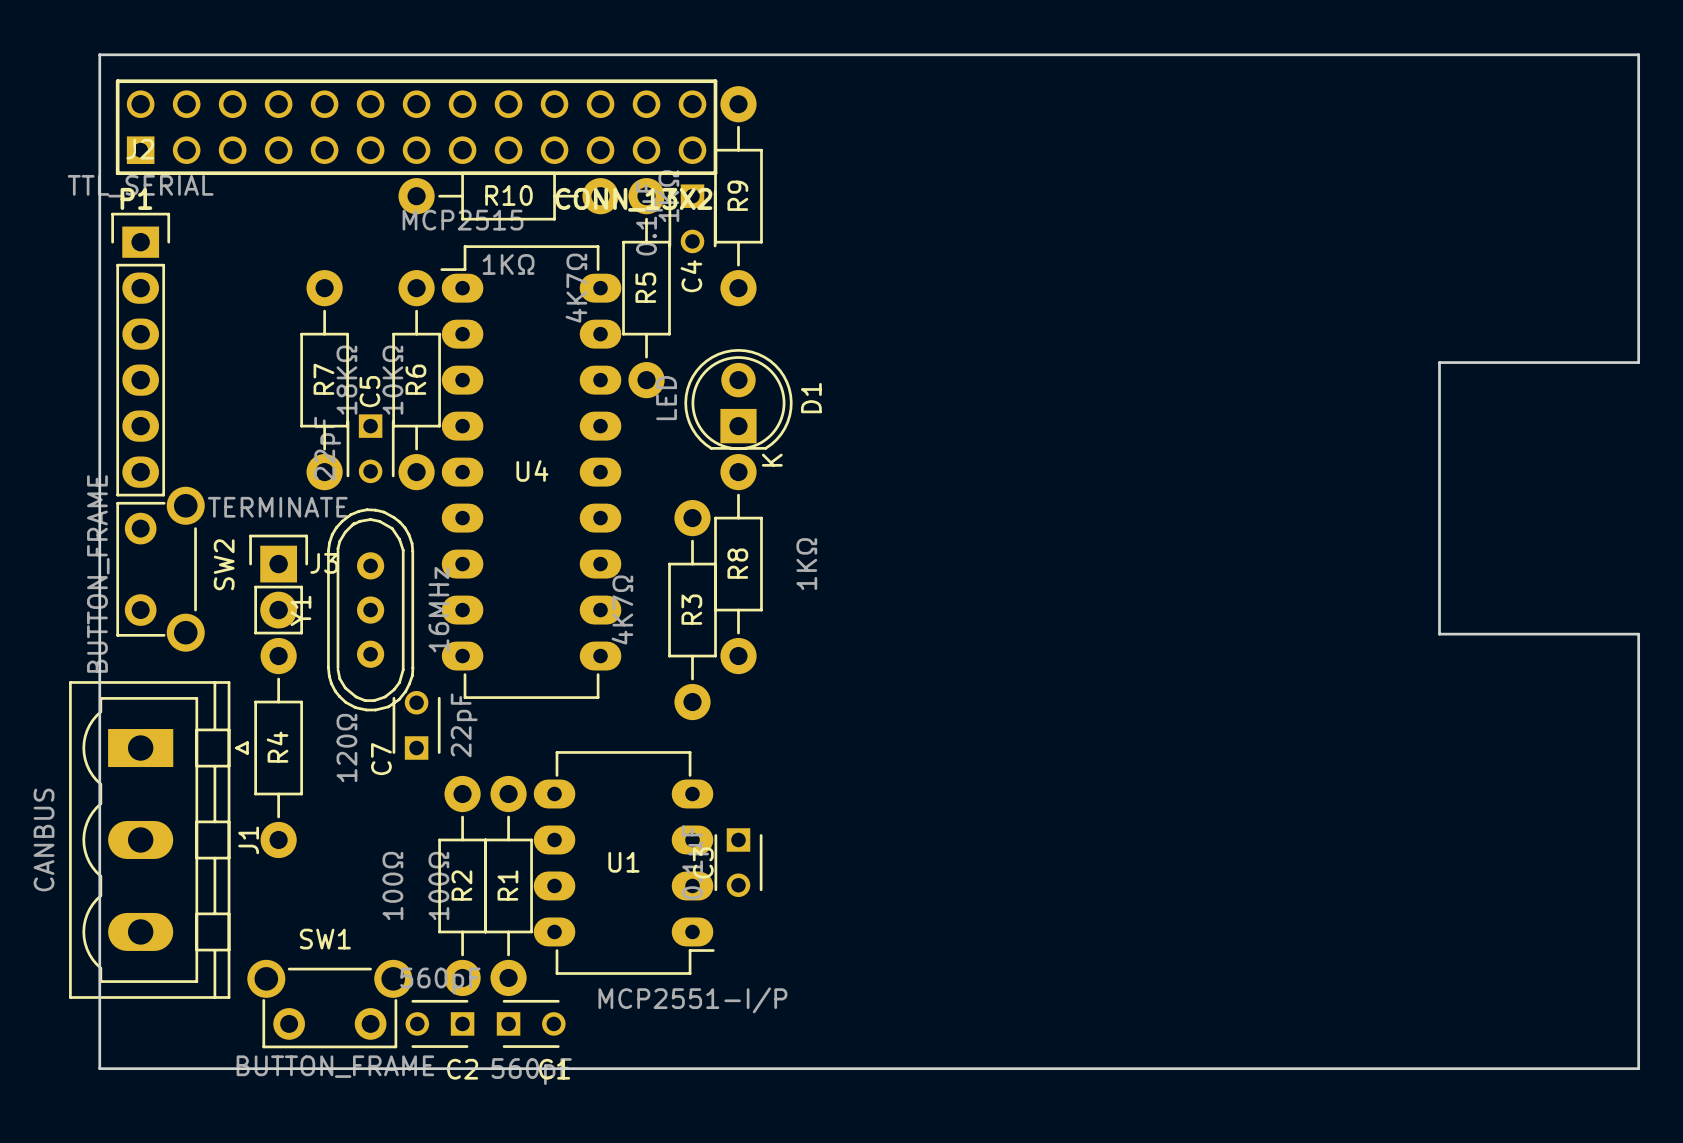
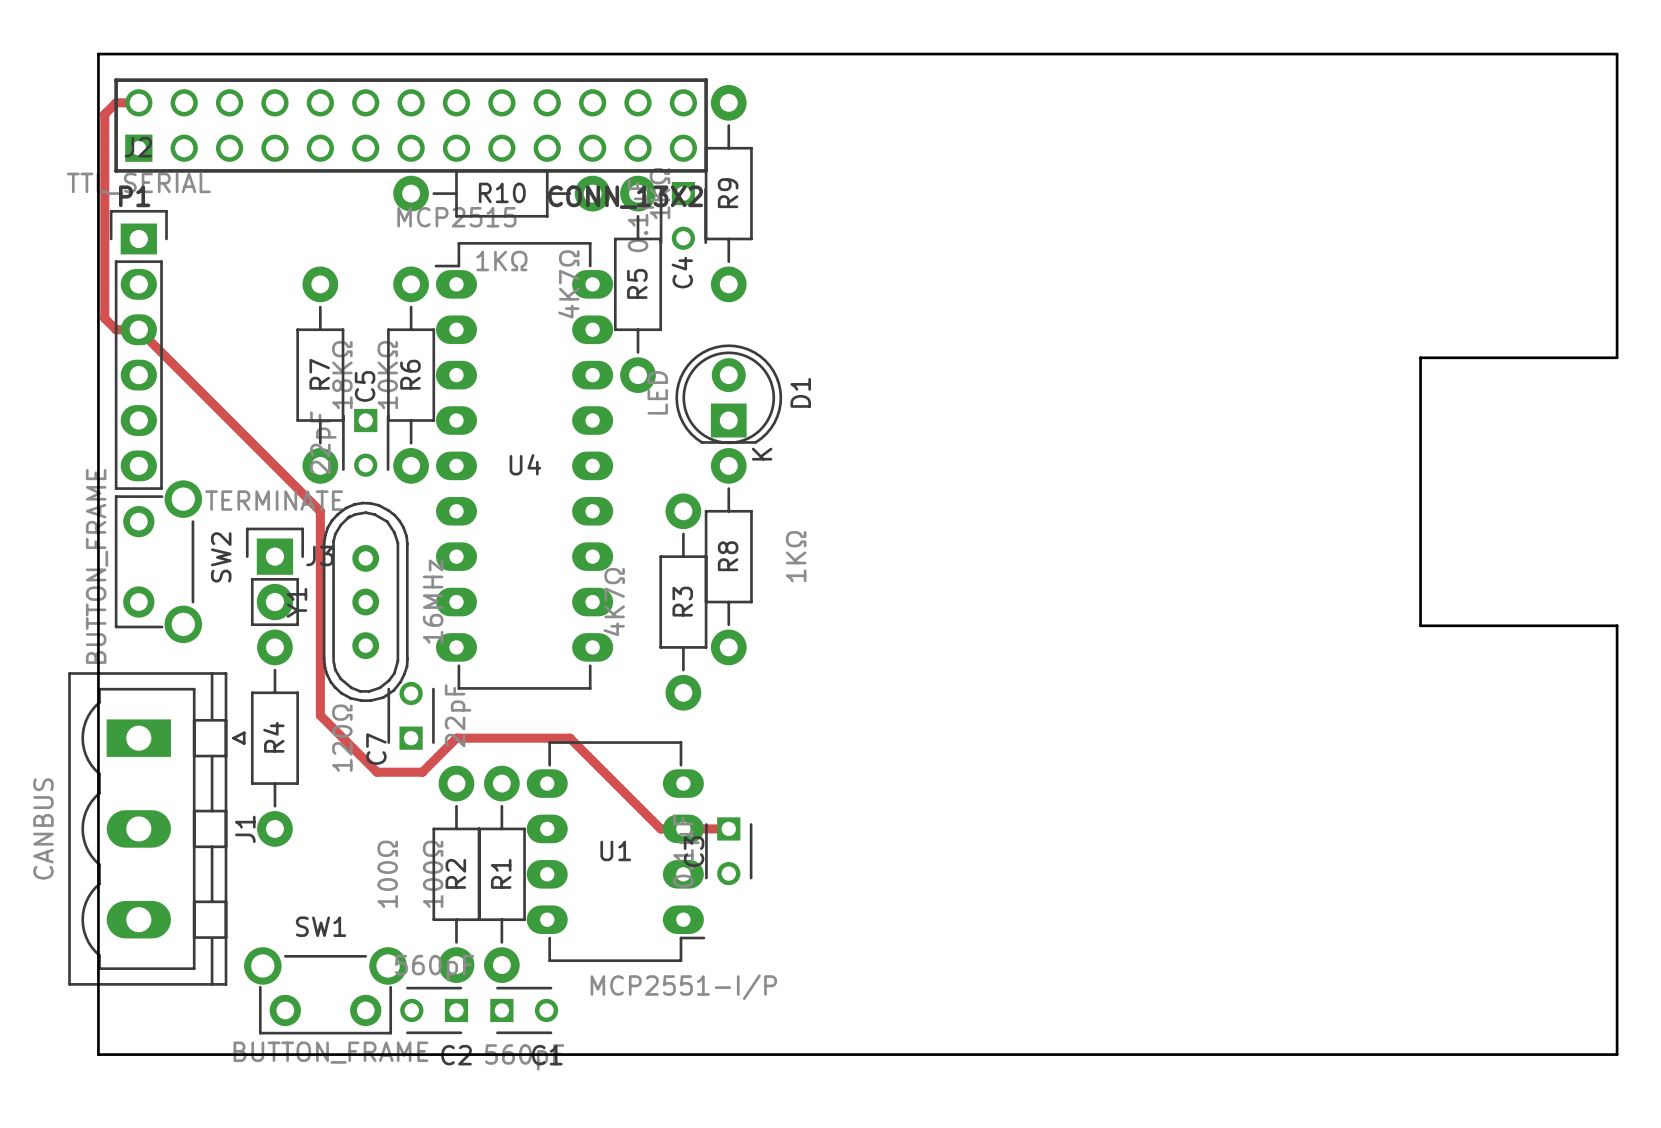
track: none -> (138, 102) (116, 102) (104, 114) (104, 318) (116, 329) (138, 329) (320, 511) (320, 715) (377, 772) (422, 772) (456, 738) (569, 738) (660, 828) (728, 828)

